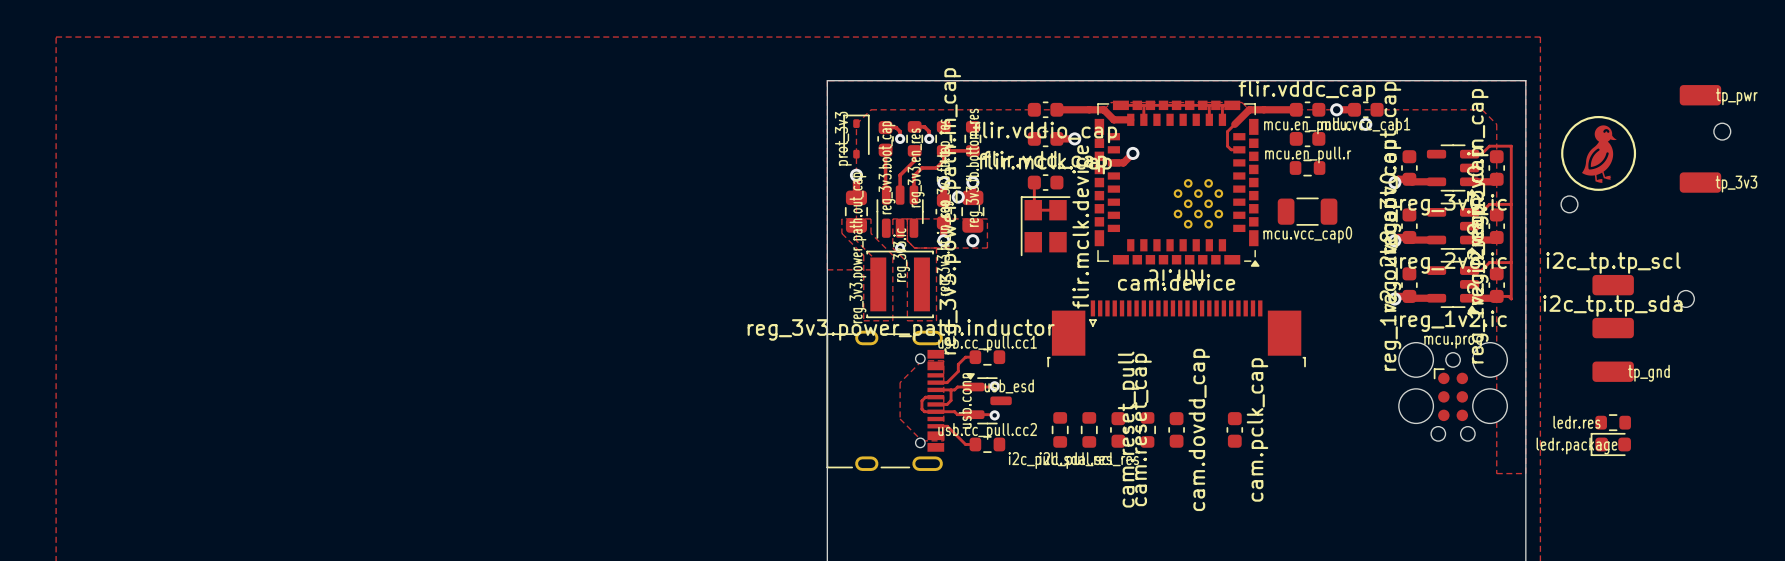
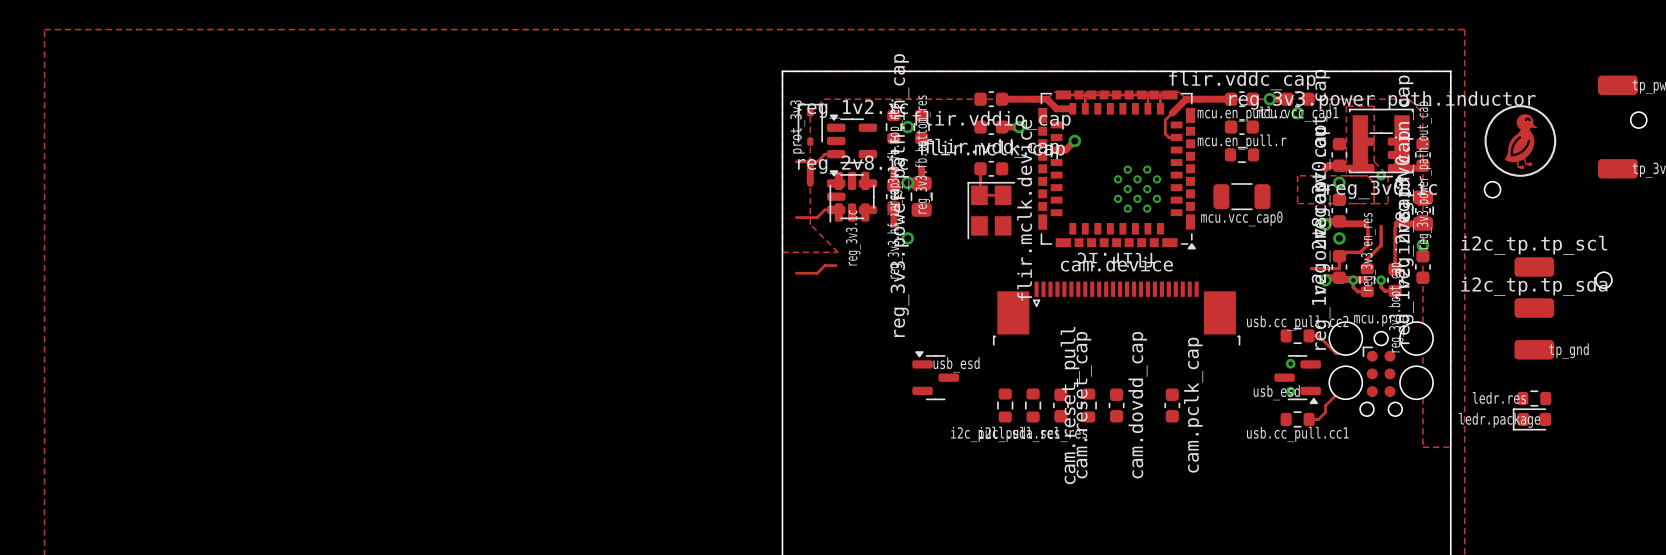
track: (914, 126) (924, 126) (929, 131) (929, 138) -> none
track: (885, 127) (896, 127) (900, 131) (900, 138) -> none
reg_3v3.boot_cap position: (885, 138) -> (1395, 280)
via: (900, 138) -> none
reg_3v3.en_res position: (914, 138) -> (1367, 280)
via: (929, 138) -> none
via: none -> (907, 127)
track: (885, 150) (885, 194) -> none
track: (914, 150) (914, 160) (900, 175) (900, 195) -> none
track: (972, 150) (943, 150) (943, 160) (936, 167) (921, 167) (913, 176) (913, 195) -> none
track: (1469, 154) (1481, 154) (1489, 146) (1511, 146) (1511, 298) (1508, 296) (1469, 298) -> none
track: none -> (836, 154) (824, 154) (817, 161) (796, 161)
reg_3v3.en_res name position: reg_3v3.en_res (916, 167) -> reg_3v3.en_res (1368, 251)
via: (856, 175) -> none
via: (943, 182) -> none
via: (972, 182) -> none
via position: (1394, 182) -> (1339, 182)
zone outline: none -> (1346, 175) (1346, 106) (1374, 106) (1374, 161) (1388, 175) (1388, 203) (1297, 203) (1297, 175) (1367, 175) (1374, 182) (1374, 203)
via: none -> (1381, 175)
track: (1511, 204) (1489, 204) (1481, 212) (1469, 212) -> none
reg_3v3.power_path.out_cap position: (856, 211) -> (1422, 210)
zone outline: (841, 218) (871, 218) (871, 233) (892, 255) (892, 320) (863, 320) (863, 255) (841, 233) (841, 218) -> none
zone outline: (907, 218) (907, 240) (914, 248) (987, 248) (987, 218) (892, 218) (892, 248) (907, 262) (907, 320) (936, 320) (936, 248) -> none
track: none -> (836, 209) (824, 209) (817, 217) (796, 217)
reg_2v8.ic rotation: 0° (1453, 228) -> 180° (852, 194)
reg_2v8.ic position: (1453, 228) -> (852, 194)
via: (943, 240) -> none
via: (972, 240) -> none
track: none -> (1367, 226) (1367, 244) (1360, 252) (1346, 252) (1339, 259) (1339, 268) (1311, 268)
track: none -> (1381, 226) (1381, 245) (1367, 259) (1367, 268)
track: none -> (1395, 227) (1395, 269)
reg_3v3.power_path.out_cap name position: reg_3v3.power_path.out_cap (857, 247) -> reg_3v3.power_path.out_cap (1424, 175)
via: (900, 248) -> none
via: none -> (907, 238)
via: none -> (1339, 238)
via: none -> (1422, 245)
track: (1511, 262) (1489, 262) (1481, 270) (1469, 270) -> none
track: none -> (836, 265) (824, 265) (817, 273) (796, 273)
reg_3v3.power_path.inductor position: (900, 284) -> (1381, 140)
reg_1v2.ic rotation: 0° (1453, 286) -> 180° (852, 139)
reg_1v2.ic position: (1453, 286) -> (852, 139)
track: none -> (1353, 280) (1353, 287) (1357, 291) (1367, 291)
via: none -> (1353, 280)
track: none -> (1381, 280) (1381, 287) (1384, 290) (1395, 290)
via: none -> (1381, 280)
reg_3v3.power_path.inductor name position: reg_3v3.power_path.inductor (901, 329) -> reg_3v3.power_path.inductor (1382, 100)
usb.cc_pull.cc1 name position: usb.cc_pull.cc1 (987, 344) -> usb.cc_pull.cc1 (1297, 434)
track: (975, 357) (965, 357) (958, 364) (958, 371) (947, 382) (935, 382) -> none
usb.cc_pull.cc1 position: (987, 357) -> (1297, 419)
track: none -> (1309, 335) (1318, 335) (1335, 353) (1346, 353)
zone outline: (921, 360) (900, 382) (900, 419) (921, 440) (943, 440) (943, 360) (921, 360) -> none
track: (994, 386) (957, 387) (954, 389) (935, 389) -> none
via: (994, 386) -> none
via: none -> (1290, 363)
track: (951, 389) (951, 400) (947, 404) (935, 404) -> none
track: (935, 397) (925, 397) (921, 400) (921, 409) (924, 411) (954, 411) (957, 414) (994, 415) -> none
usb.conn: (885, 400) -> none
usb_esd: none -> (1297, 379)
via: (994, 415) -> none
via: none -> (1290, 391)
track: none -> (1346, 395) (1336, 395) (1325, 405) (1325, 412) (1318, 419) (1309, 419)
track: (935, 426) (947, 426) (965, 444) (975, 444) -> none
usb.cc_pull.cc2 position: (987, 444) -> (1297, 335)

